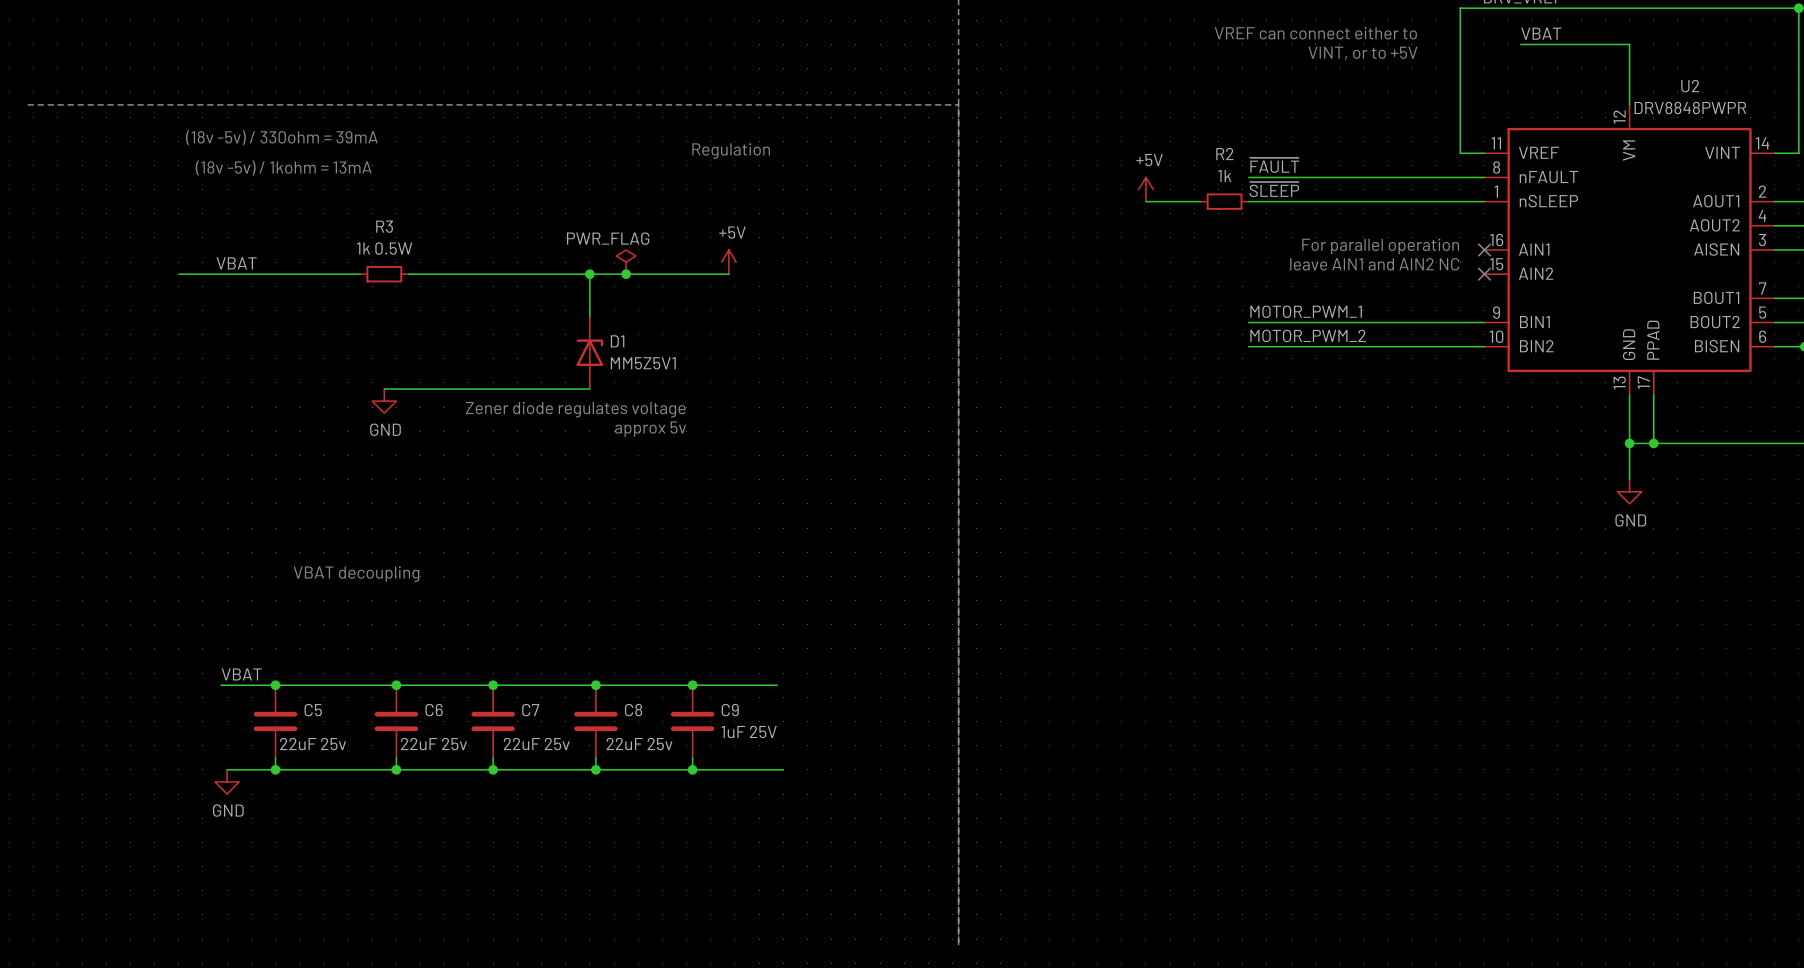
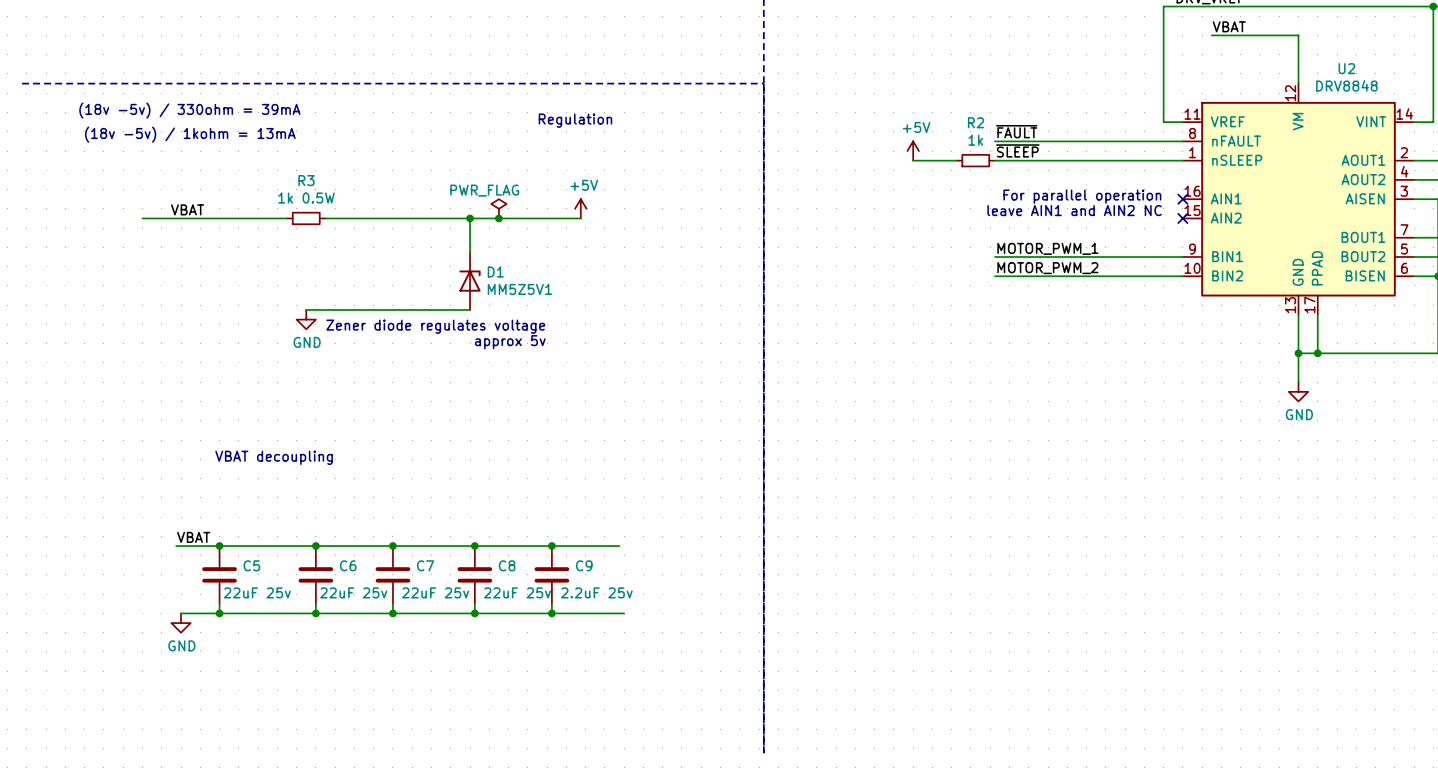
text: VREF can connect either to (1315, 33) -> none
text: VINT, or to +5V (1362, 53) -> none
U2 value: DRV8848PWPR (1690, 108) -> DRV8848 (1346, 85)
C9 value: 1uF 25V (749, 731) -> 2.2uF 25v (596, 592)

